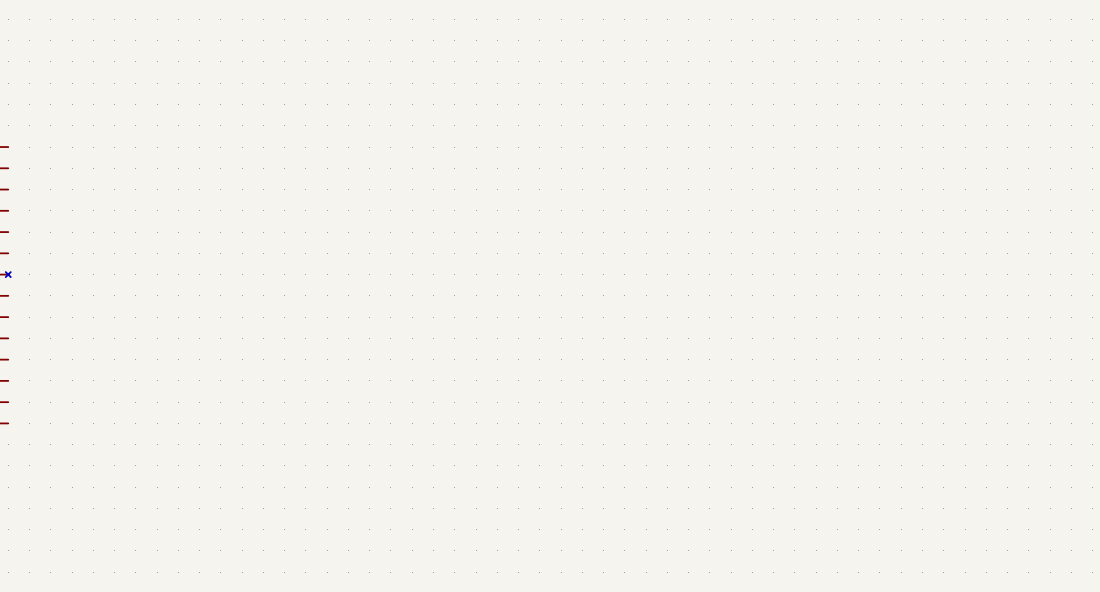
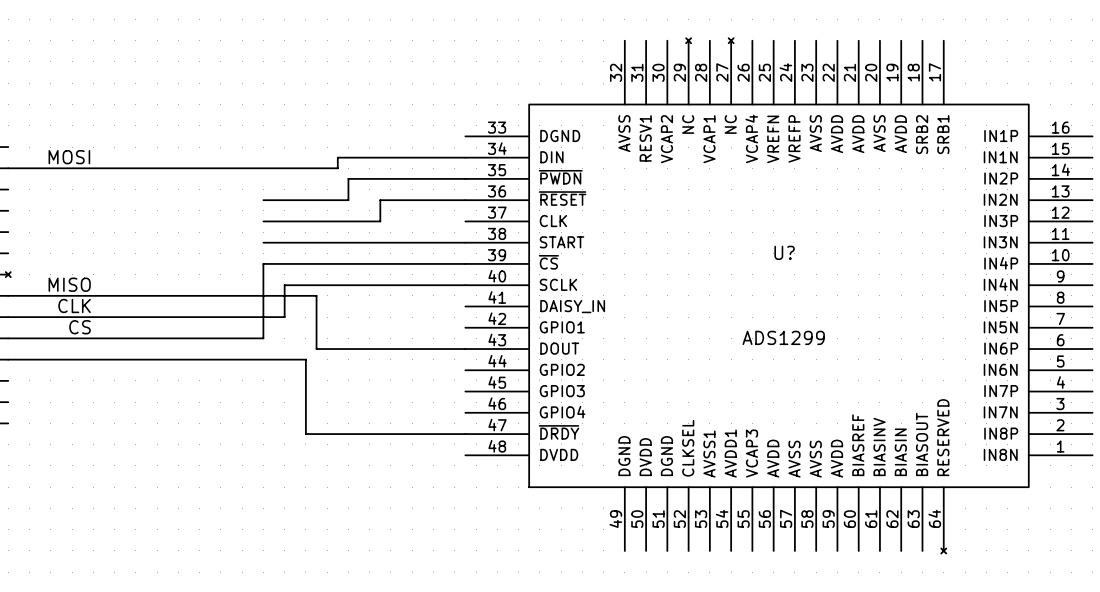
label: none -> MOSI (69, 157)
wire: none -> (465, 157) (337, 157) (337, 168) (8, 168)
wire: none -> (465, 178) (348, 178) (348, 200) (263, 200)
wire: none -> (465, 200) (380, 200) (380, 221) (263, 221)
wire: none -> (263, 242) (465, 242)
wire: none -> (465, 263) (263, 263) (263, 338) (8, 338)
label: none -> MISO (69, 284)
wire: none -> (465, 285) (284, 285) (284, 317) (8, 317)
wire: none -> (8, 295) (316, 295) (316, 349) (465, 349)
U?: none -> ADS1299 (778, 295)
label: none -> CLK (74, 305)
label: none -> CS (80, 327)
wire: none -> (8, 359) (305, 359) (305, 434) (465, 434)

